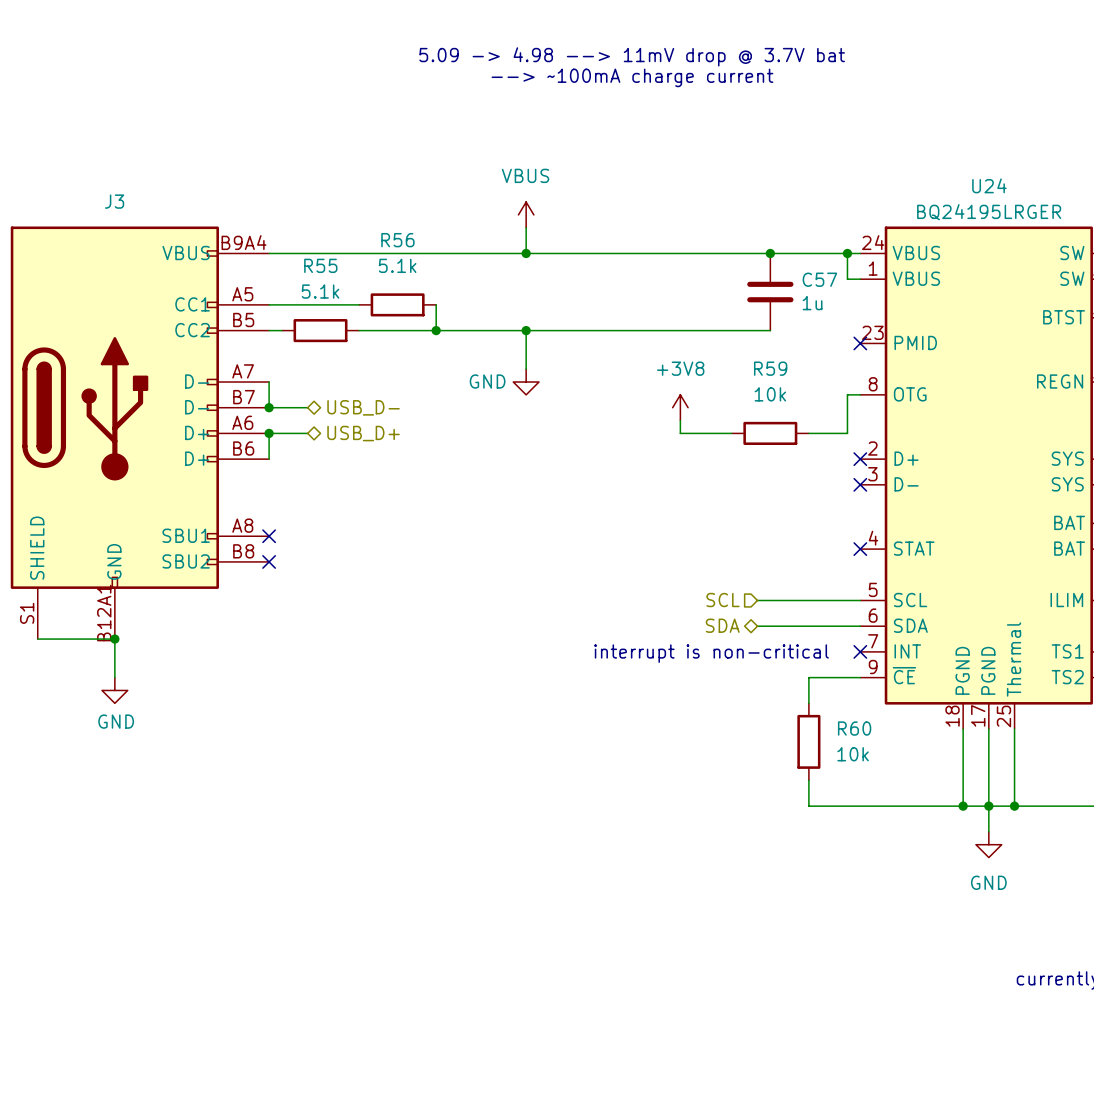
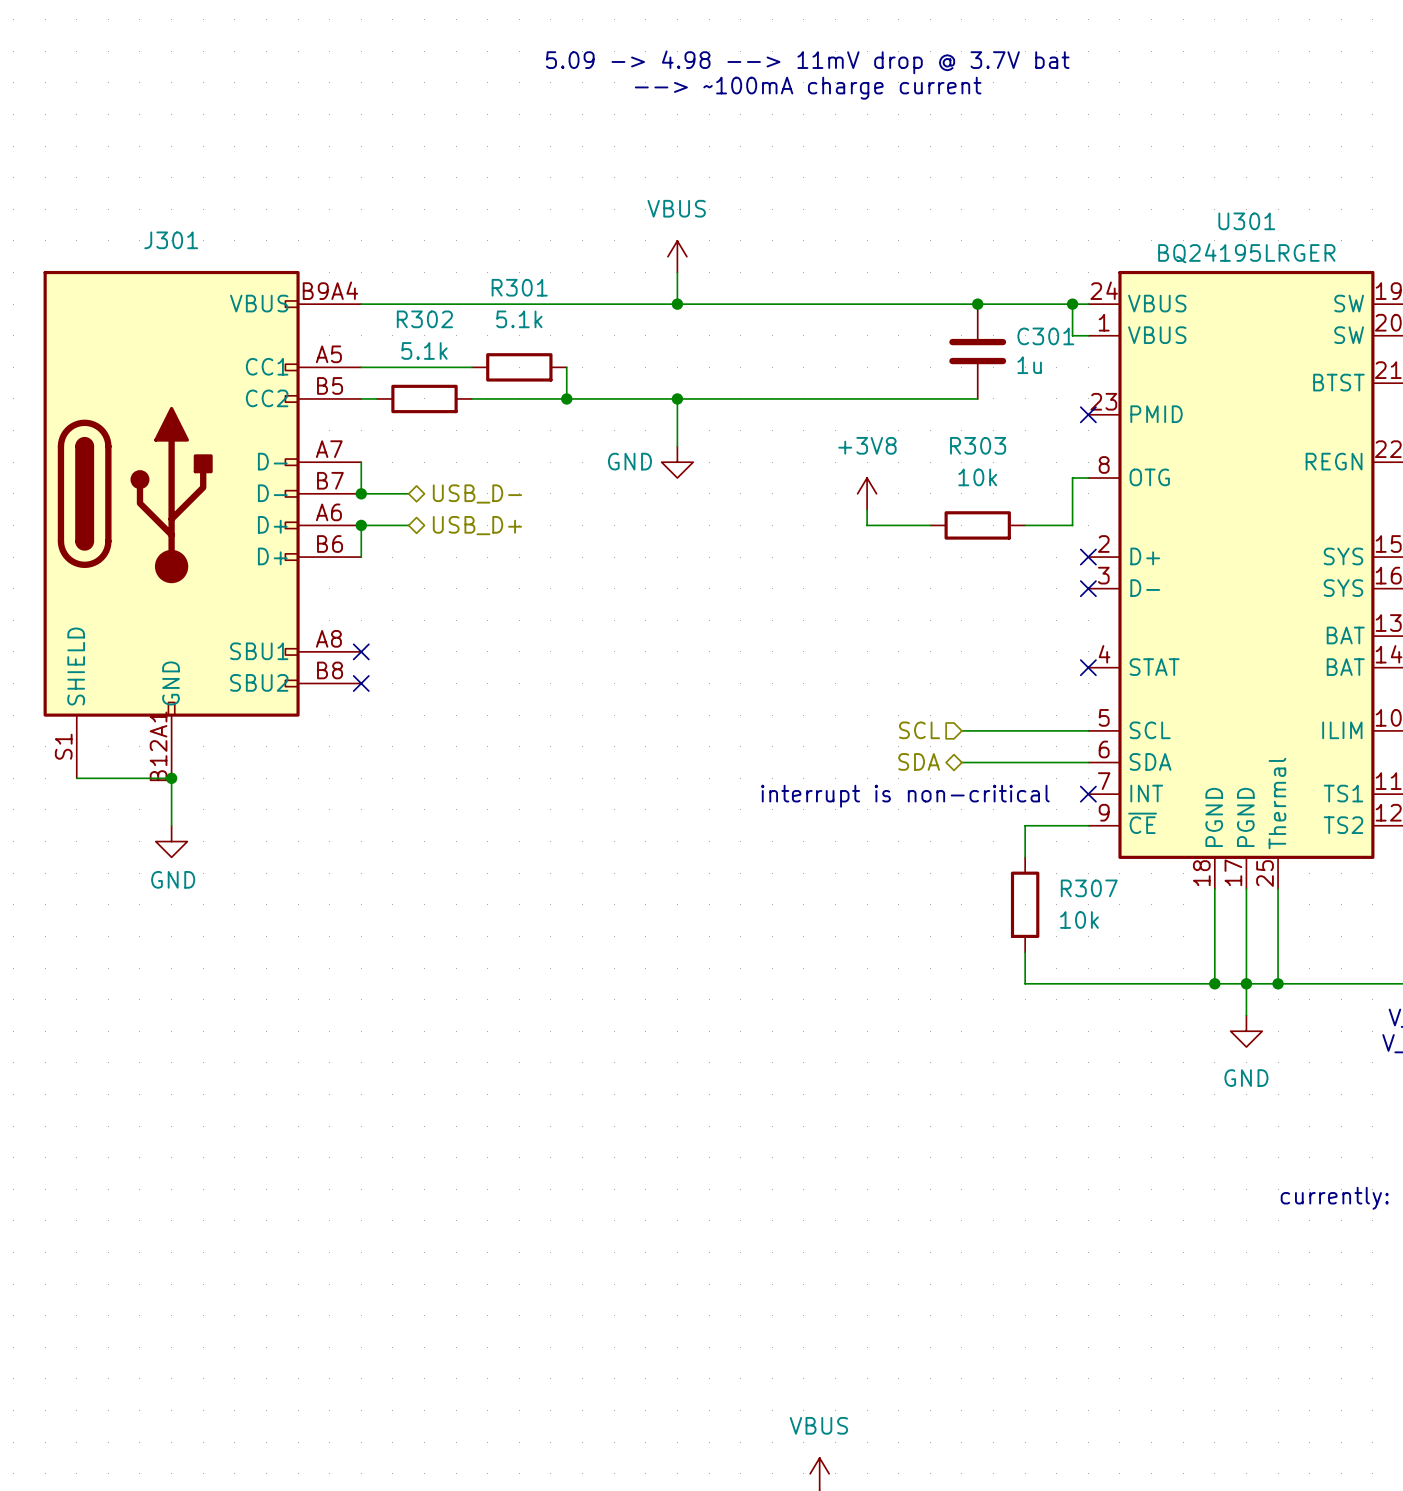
U24 name: U24 (989, 185) -> U301 (1246, 221)
J3 name: J3 (114, 201) -> J301 (171, 240)
R56 name: R56 (397, 240) -> R301 (519, 287)
R55 name: R55 (320, 265) -> R302 (424, 319)
C57 name: C57 (819, 279) -> C301 (1045, 336)
R59 name: R59 (770, 368) -> R303 (978, 445)
R60 name: R60 (854, 728) -> R307 (1089, 888)

